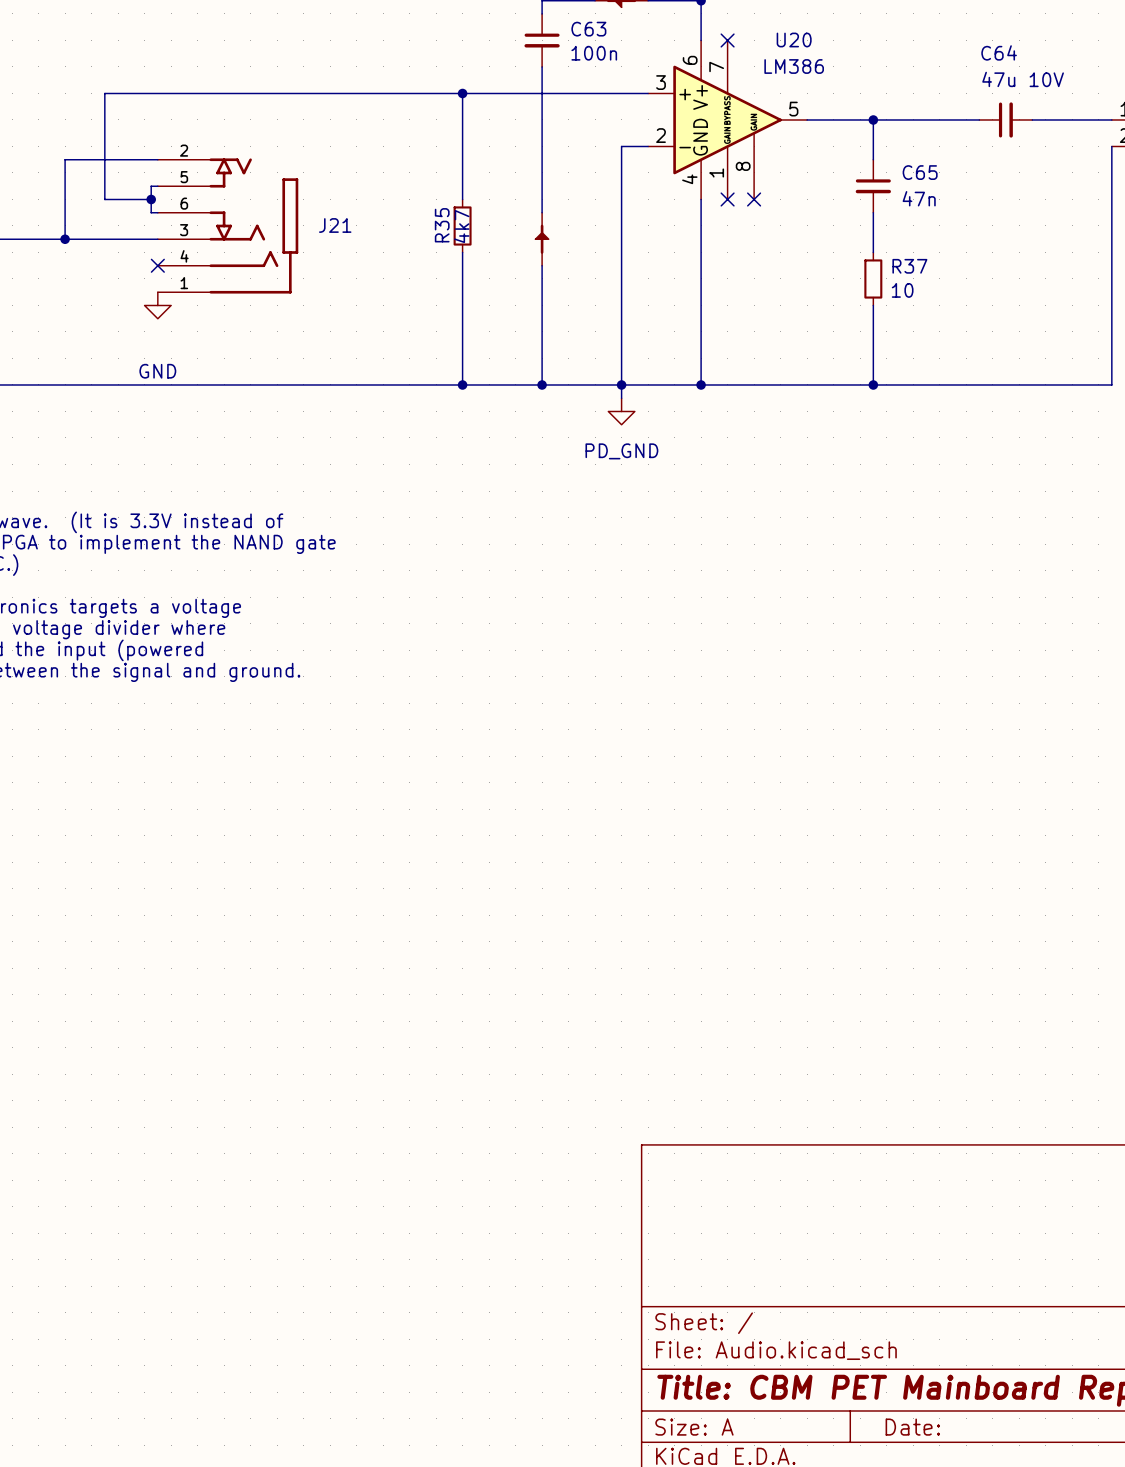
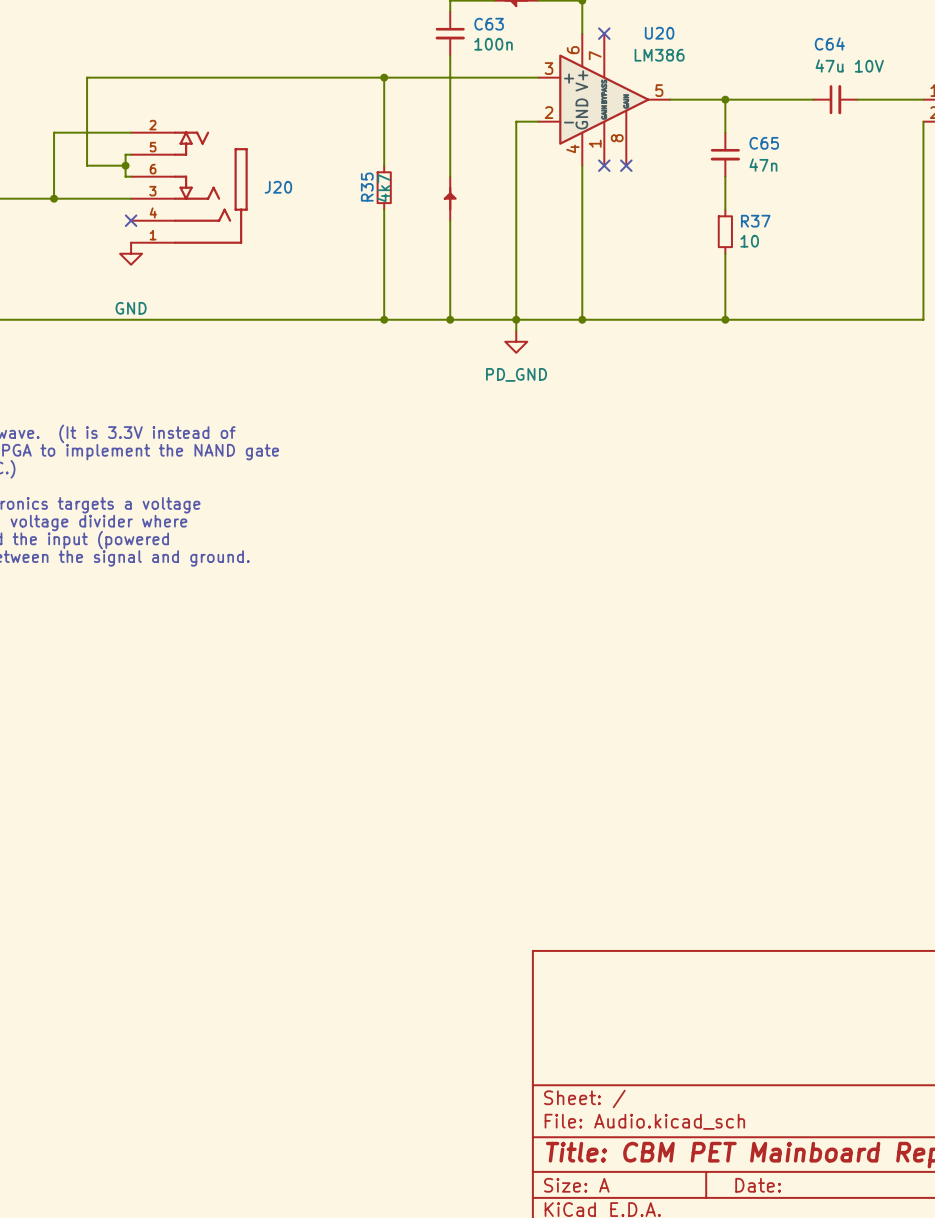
J21 name: J21 (335, 225) -> J20 (278, 187)

